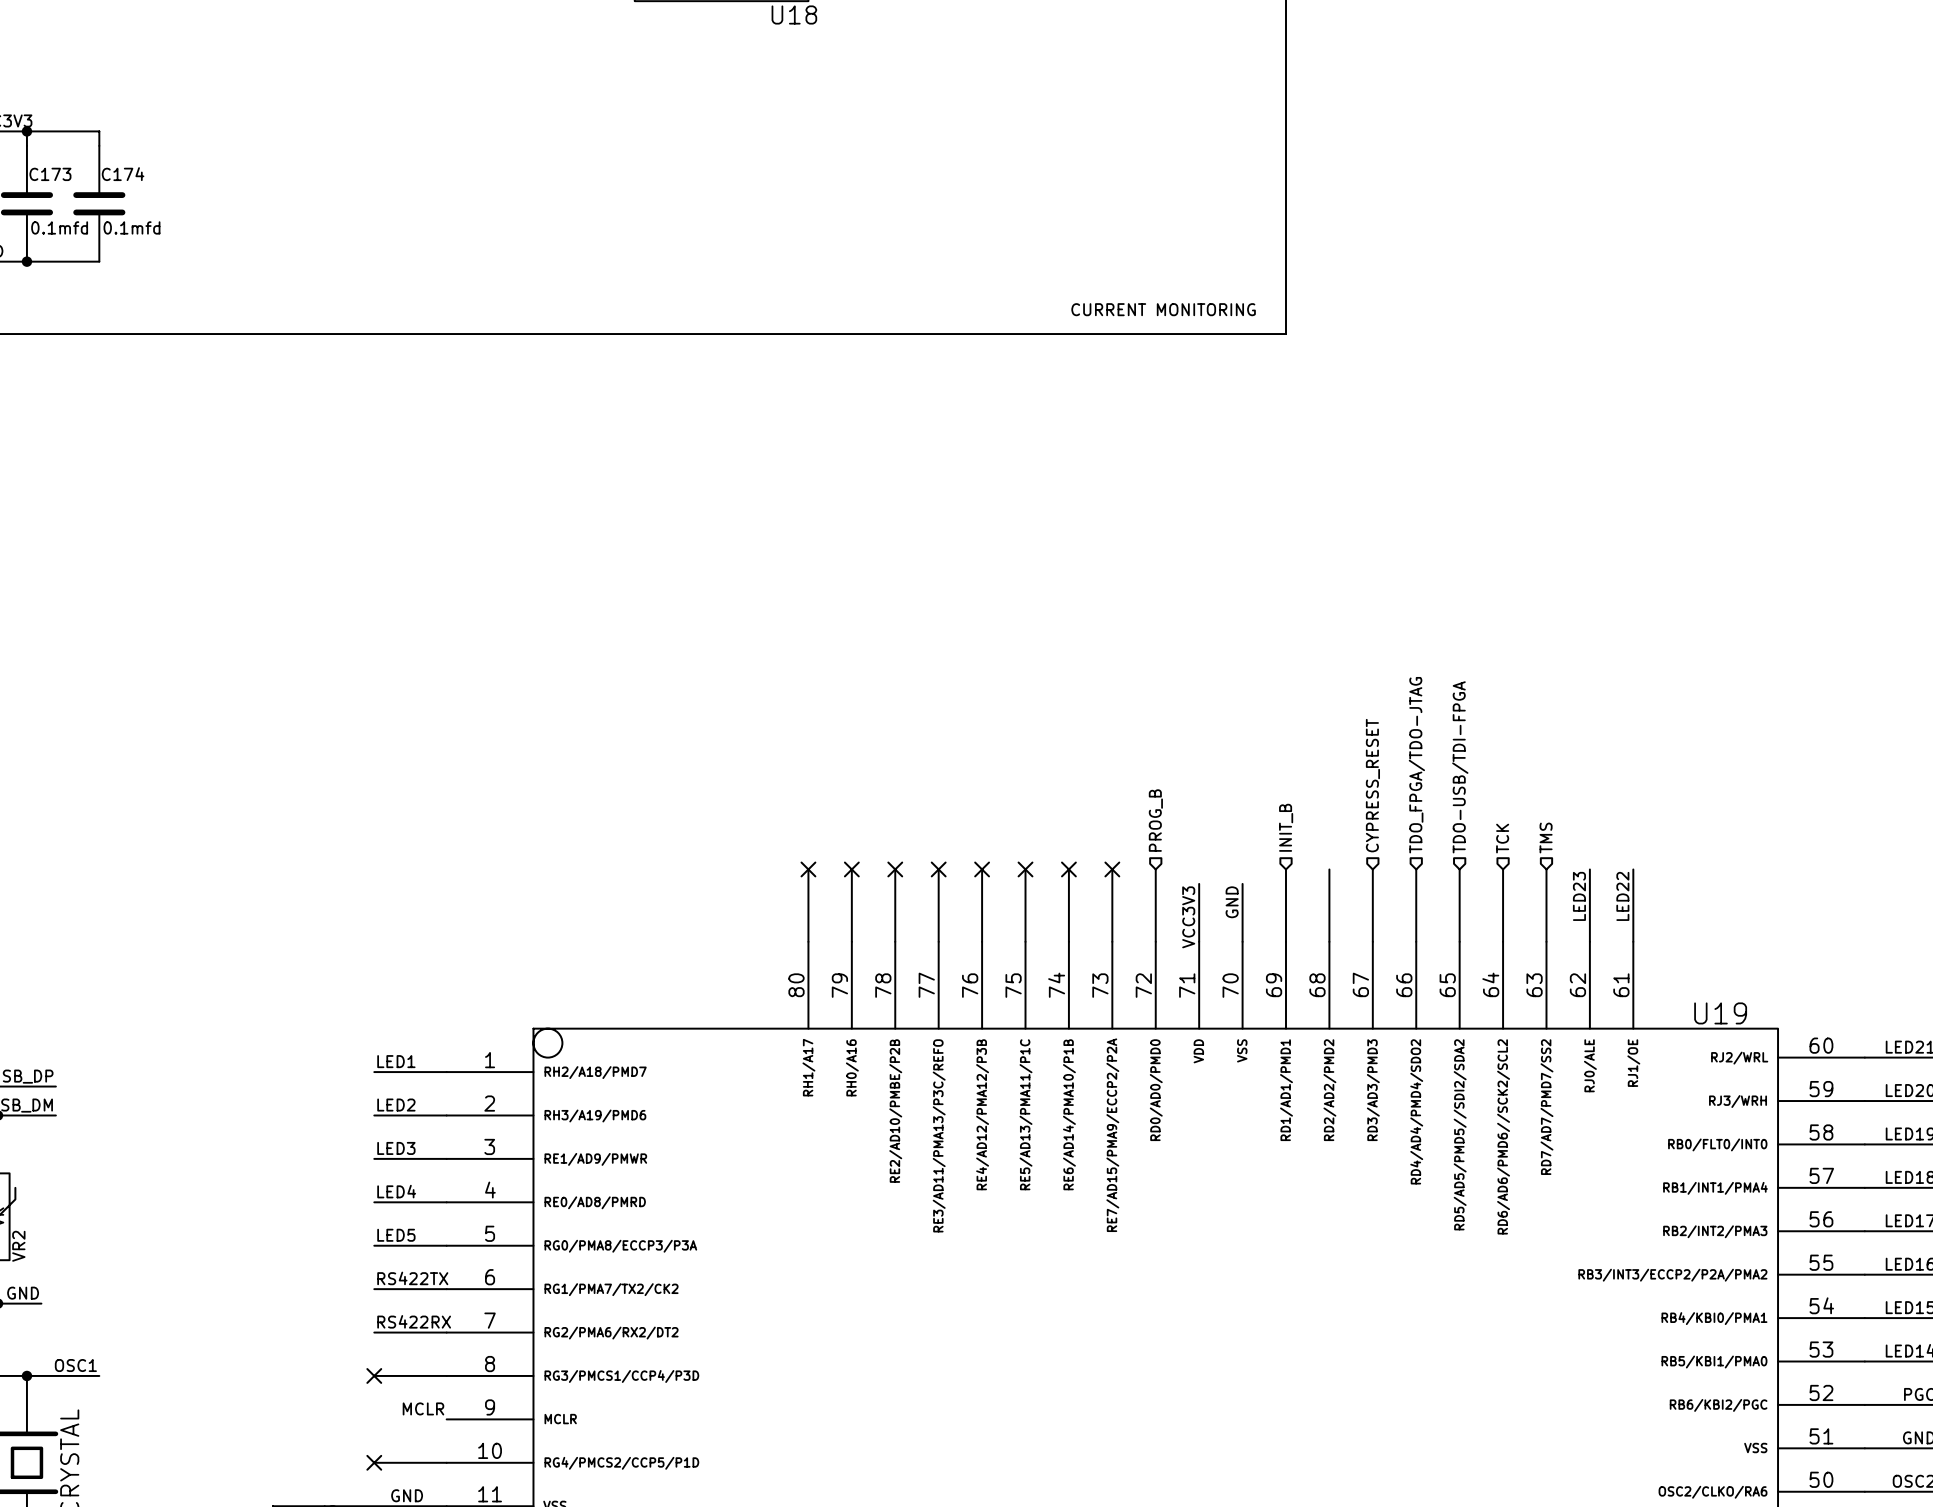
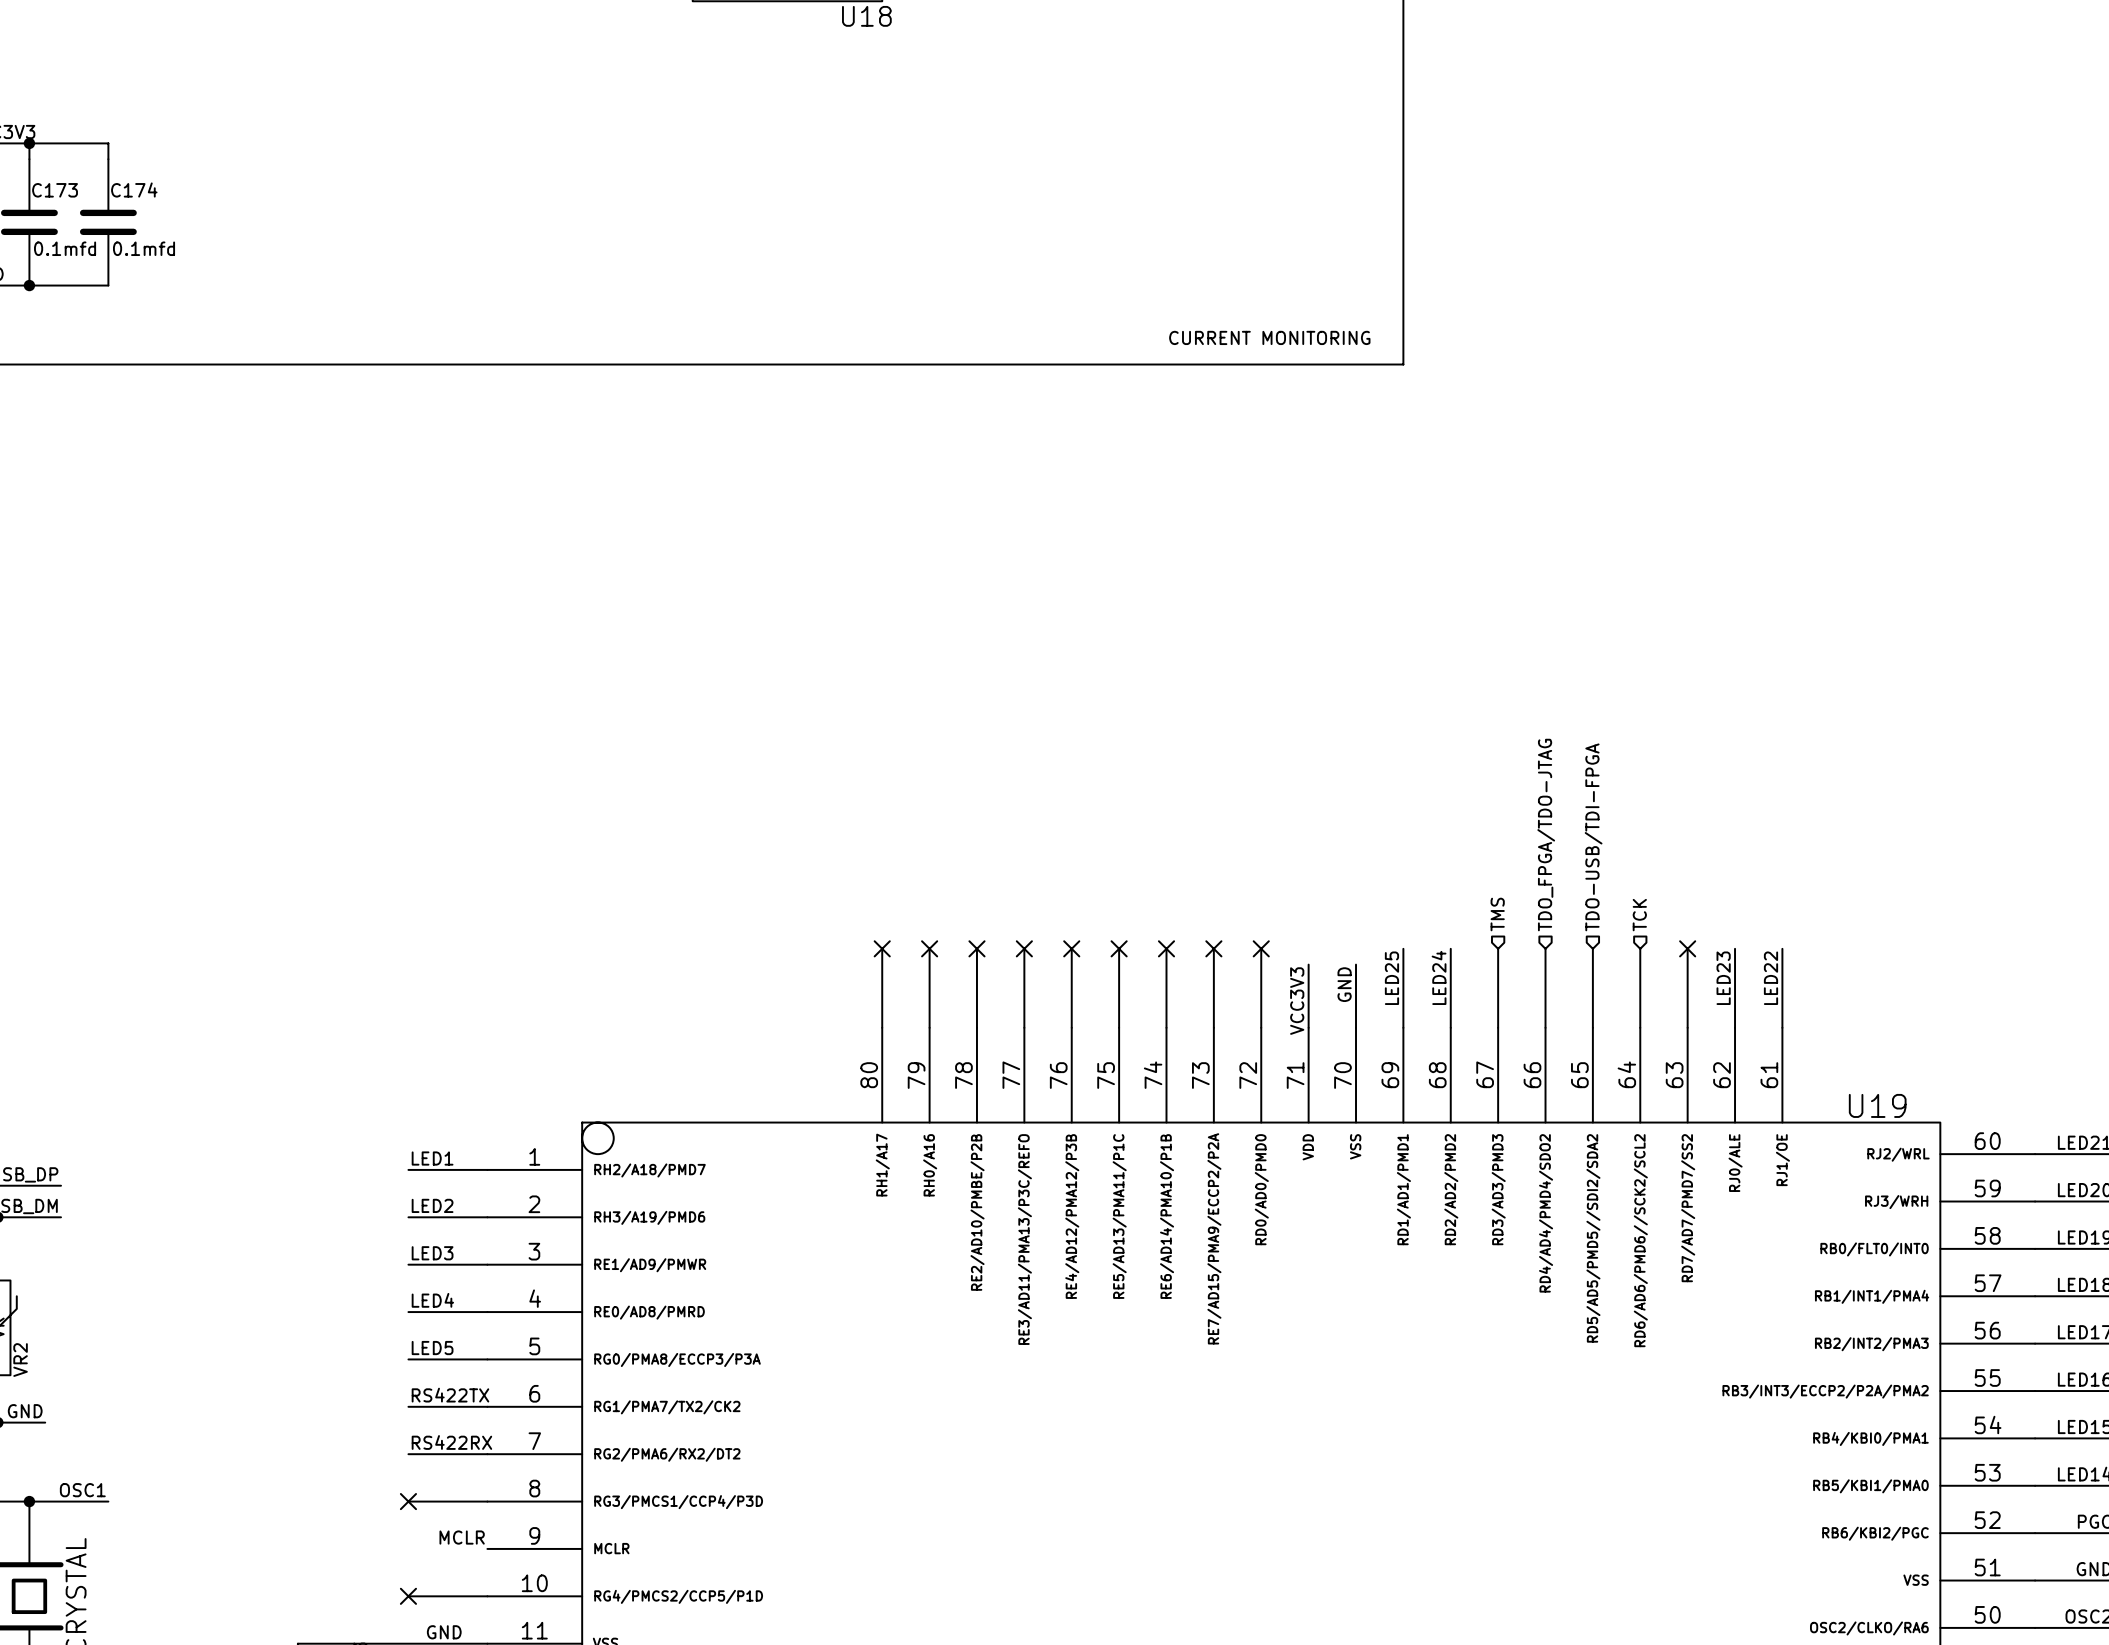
hierarchical label: CYPRESS_RESET (1372, 785) -> TMS (1497, 914)
hierarchical label: PROG_B (1155, 820) -> none
hierarchical label: INIT_B (1286, 827) -> none
hierarchical label: TMS (1546, 838) -> none
no-connect mark: none -> (1261, 948)
no-connect mark: none -> (1687, 948)
label: none -> LED25 (1391, 978)
label: none -> LED24 (1439, 977)

